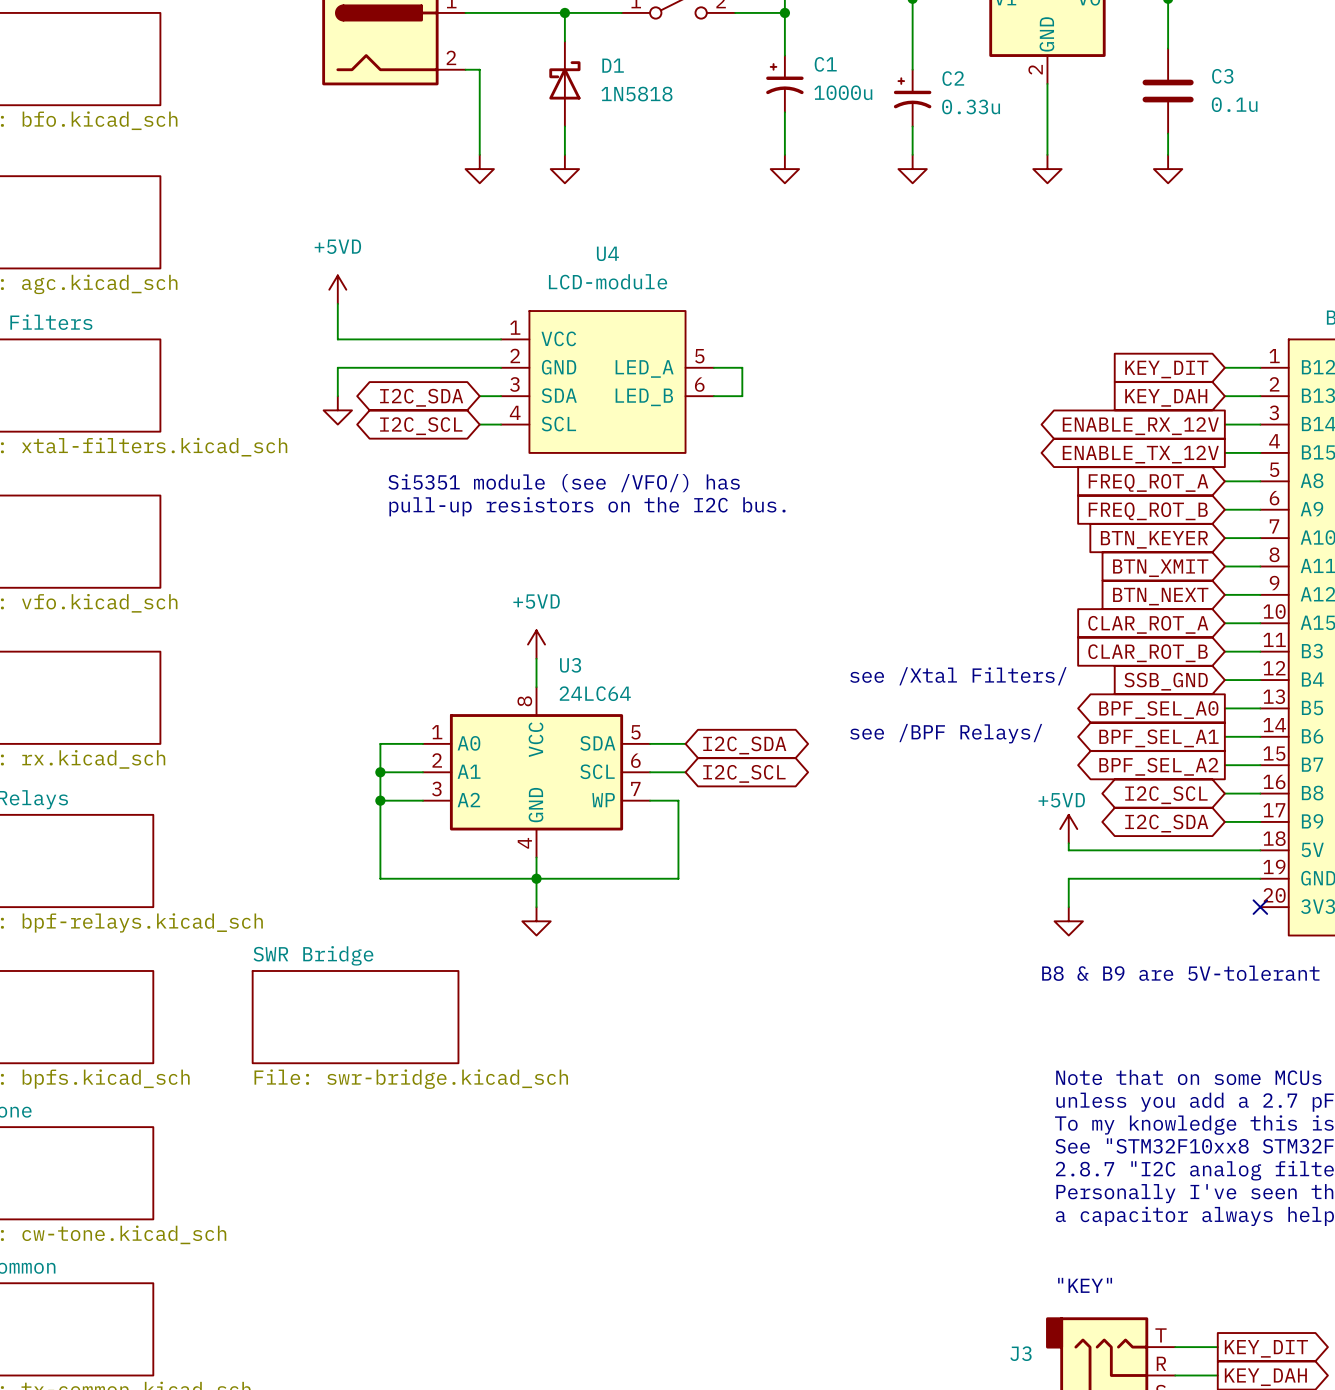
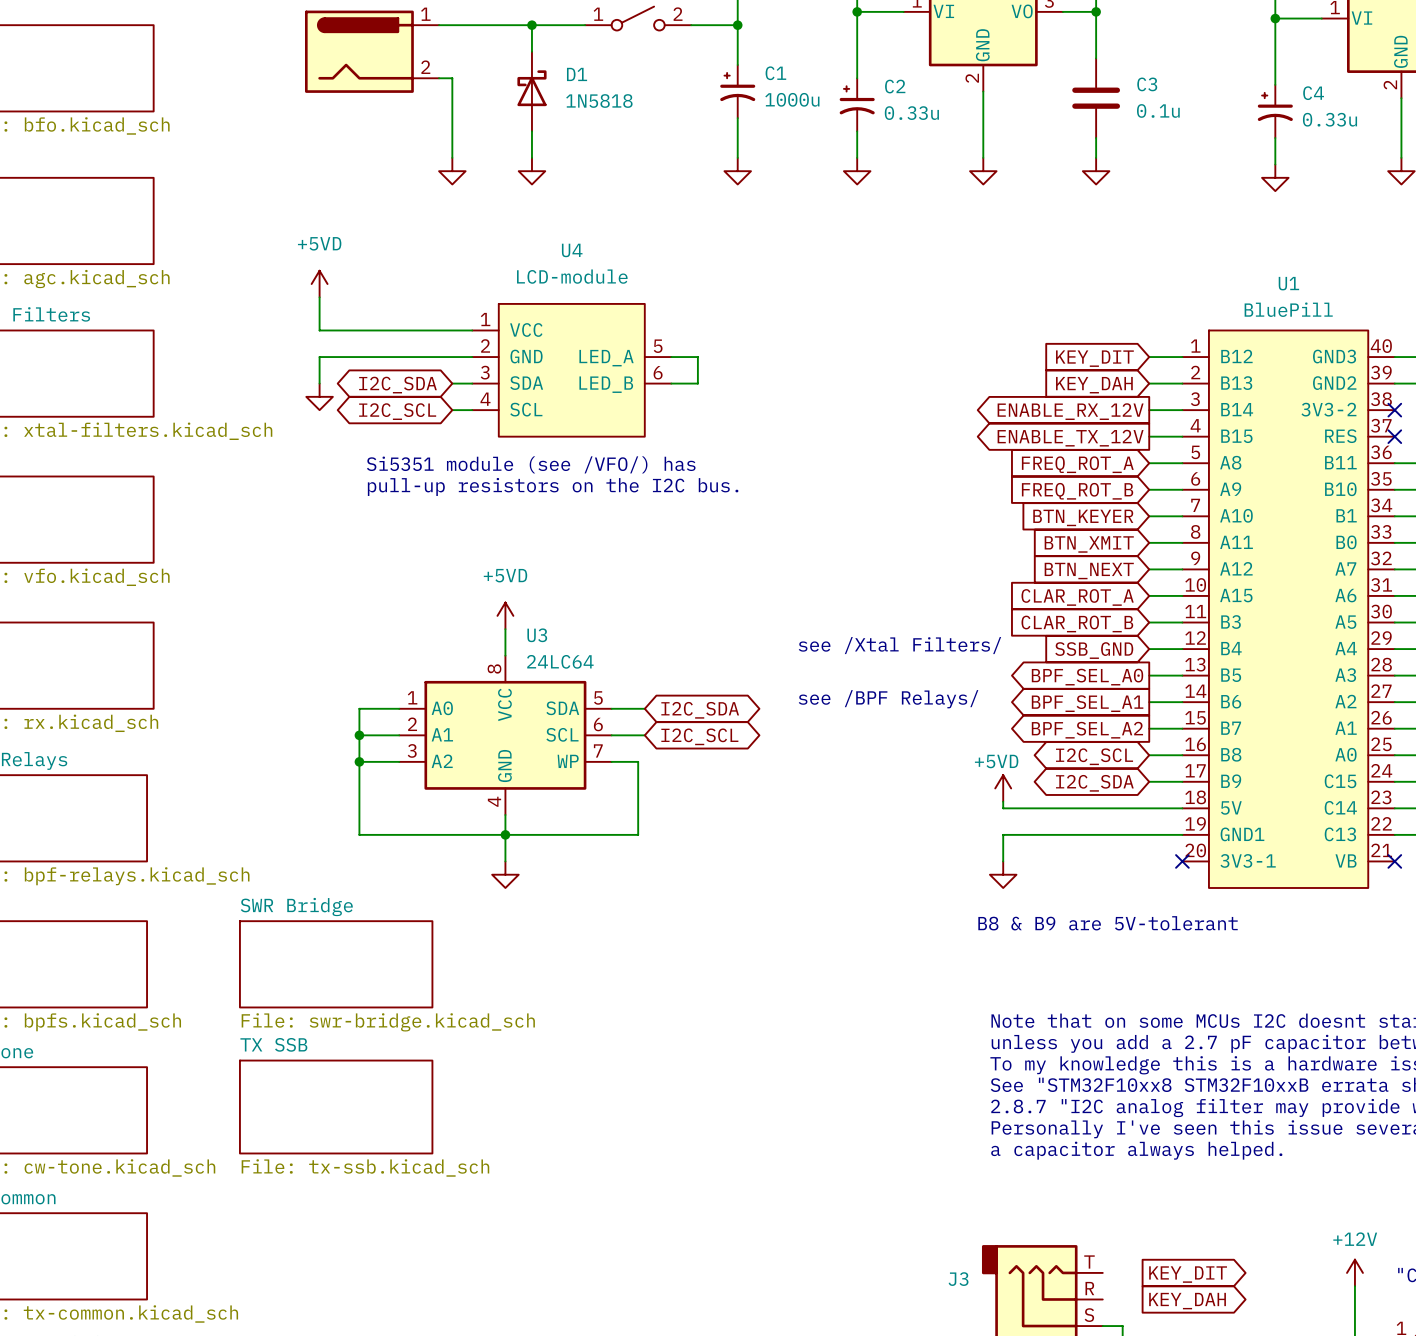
sheet TX SSB: none -> File: tx-ssb.kicad_sch (336, 1107)
text: "KEY" (1085, 1285) -> none
wire: (1175, 1347) (1217, 1347) -> none
wire: (1175, 1375) (1217, 1375) -> none

